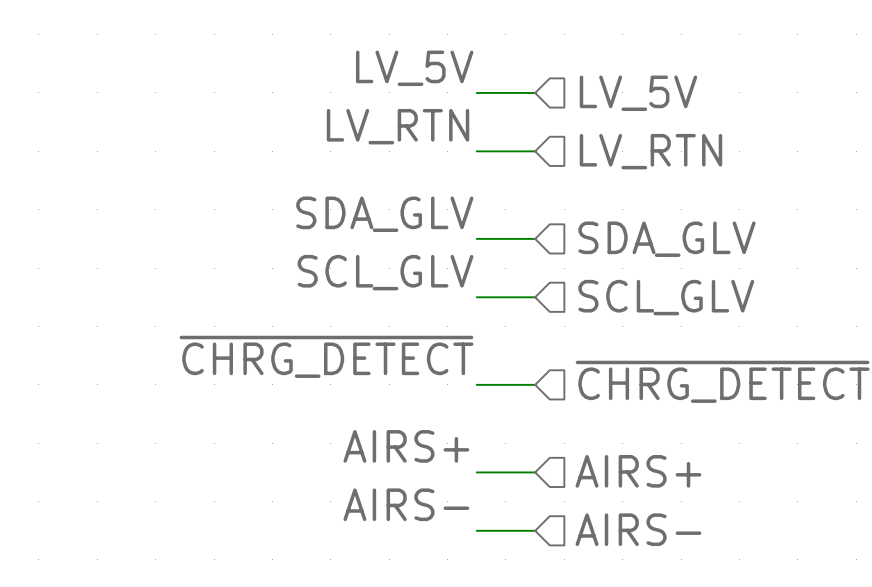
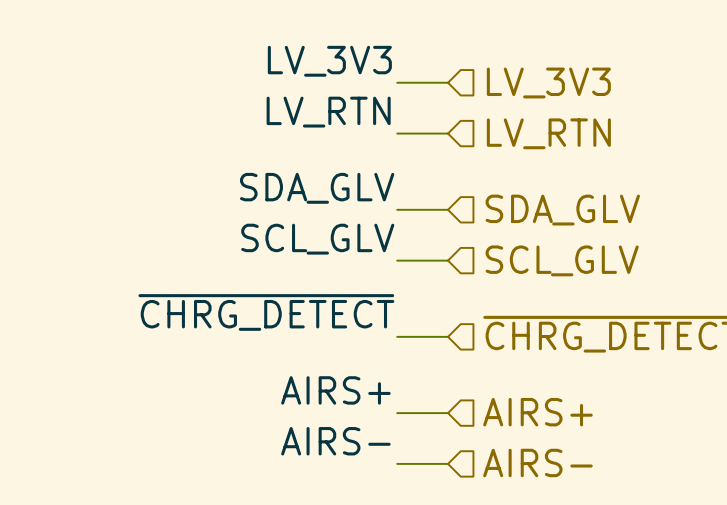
label: LV_5V (414, 68) -> LV_3V3 (329, 61)
hierarchical label: LV_5V (638, 93) -> LV_3V3 (548, 83)

